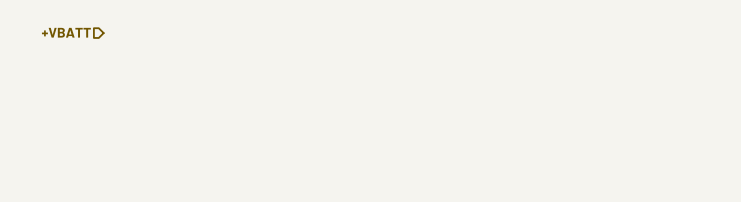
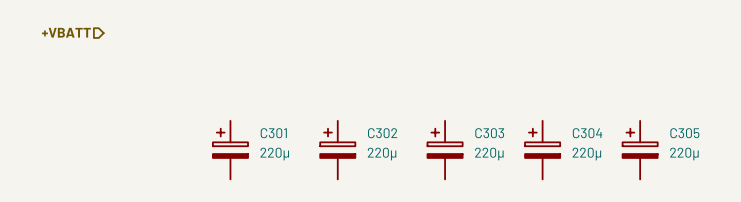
C301: none -> 220µ (230, 150)
C302: none -> 220µ (337, 150)
C303: none -> 220µ (445, 150)
C304: none -> 220µ (542, 150)
C305: none -> 220µ (640, 150)

